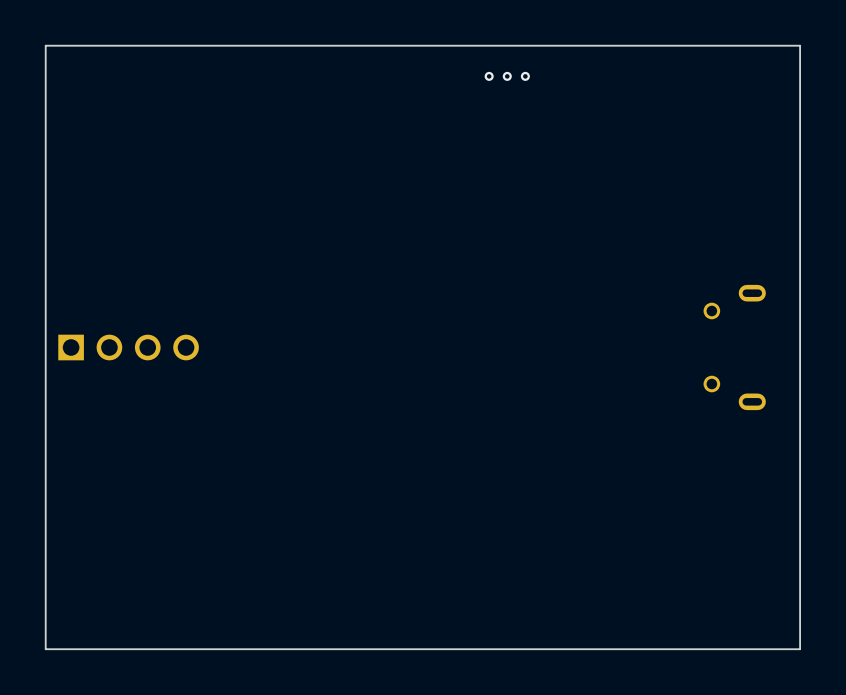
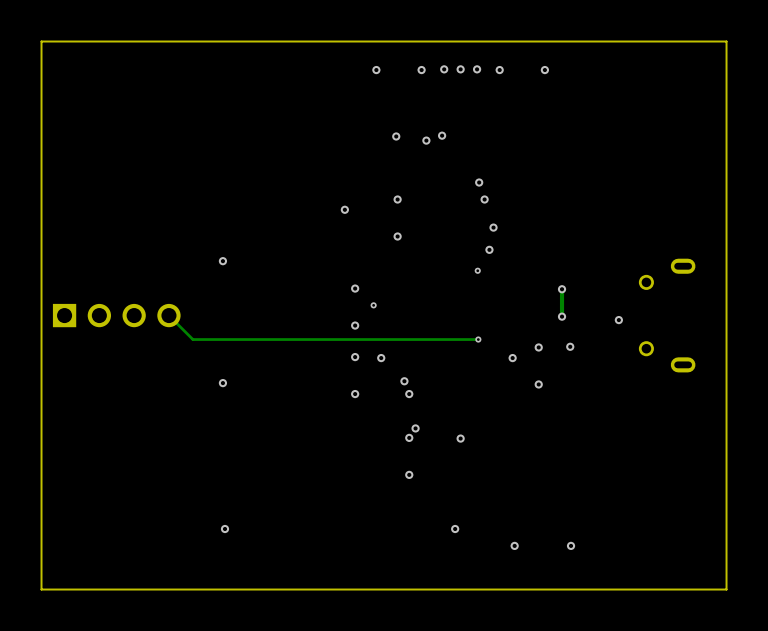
via: none -> (376, 70)
via: none -> (421, 70)
via: none -> (499, 70)
via: none -> (544, 70)
via: none -> (442, 135)
via: none -> (396, 136)
via: none -> (426, 140)
via: none -> (479, 182)
via: none -> (397, 199)
via: none -> (484, 199)
via: none -> (344, 209)
via: none -> (493, 227)
via: none -> (397, 236)
via: none -> (489, 249)
via: none -> (222, 261)
via: none -> (477, 270)
via: none -> (355, 288)
track: none -> (562, 289) (562, 316)
via: none -> (562, 289)
via: none -> (373, 305)
track: none -> (168, 315) (192, 339) (478, 339)
via: none -> (562, 316)
via: none -> (618, 320)
via: none -> (355, 325)
via: none -> (478, 339)
via: none -> (570, 346)
via: none -> (538, 347)
via: none -> (355, 357)
via: none -> (381, 358)
via: none -> (512, 358)
via: none -> (404, 381)
via: none -> (222, 383)
via: none -> (538, 384)
via: none -> (355, 394)
via: none -> (409, 394)
via: none -> (415, 428)
via: none -> (409, 437)
via: none -> (460, 438)
via: none -> (409, 474)
via: none -> (224, 529)
via: none -> (455, 529)
via: none -> (514, 545)
via: none -> (571, 545)

